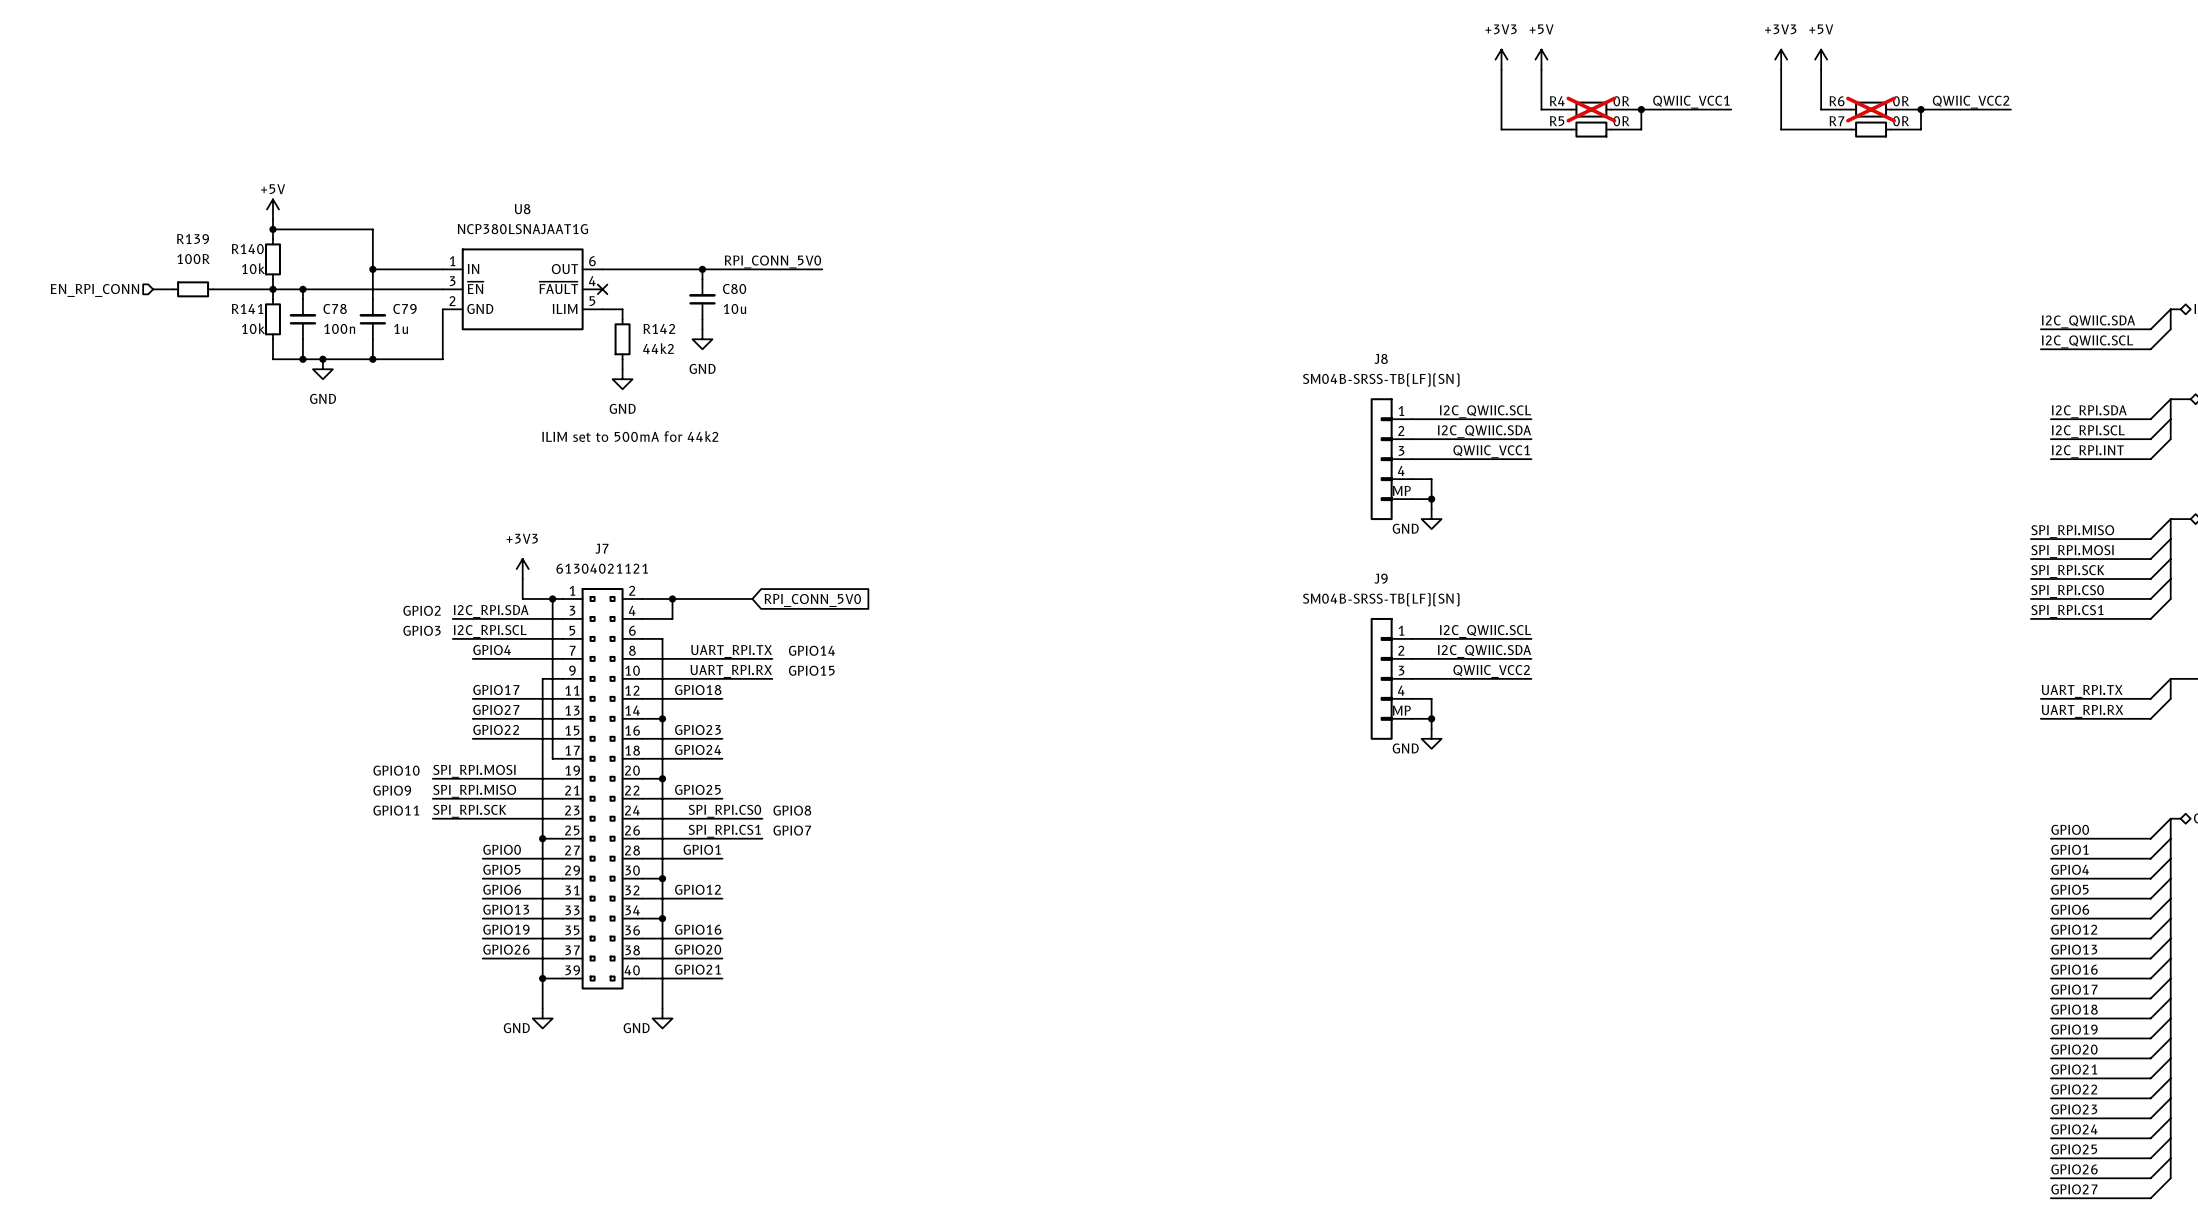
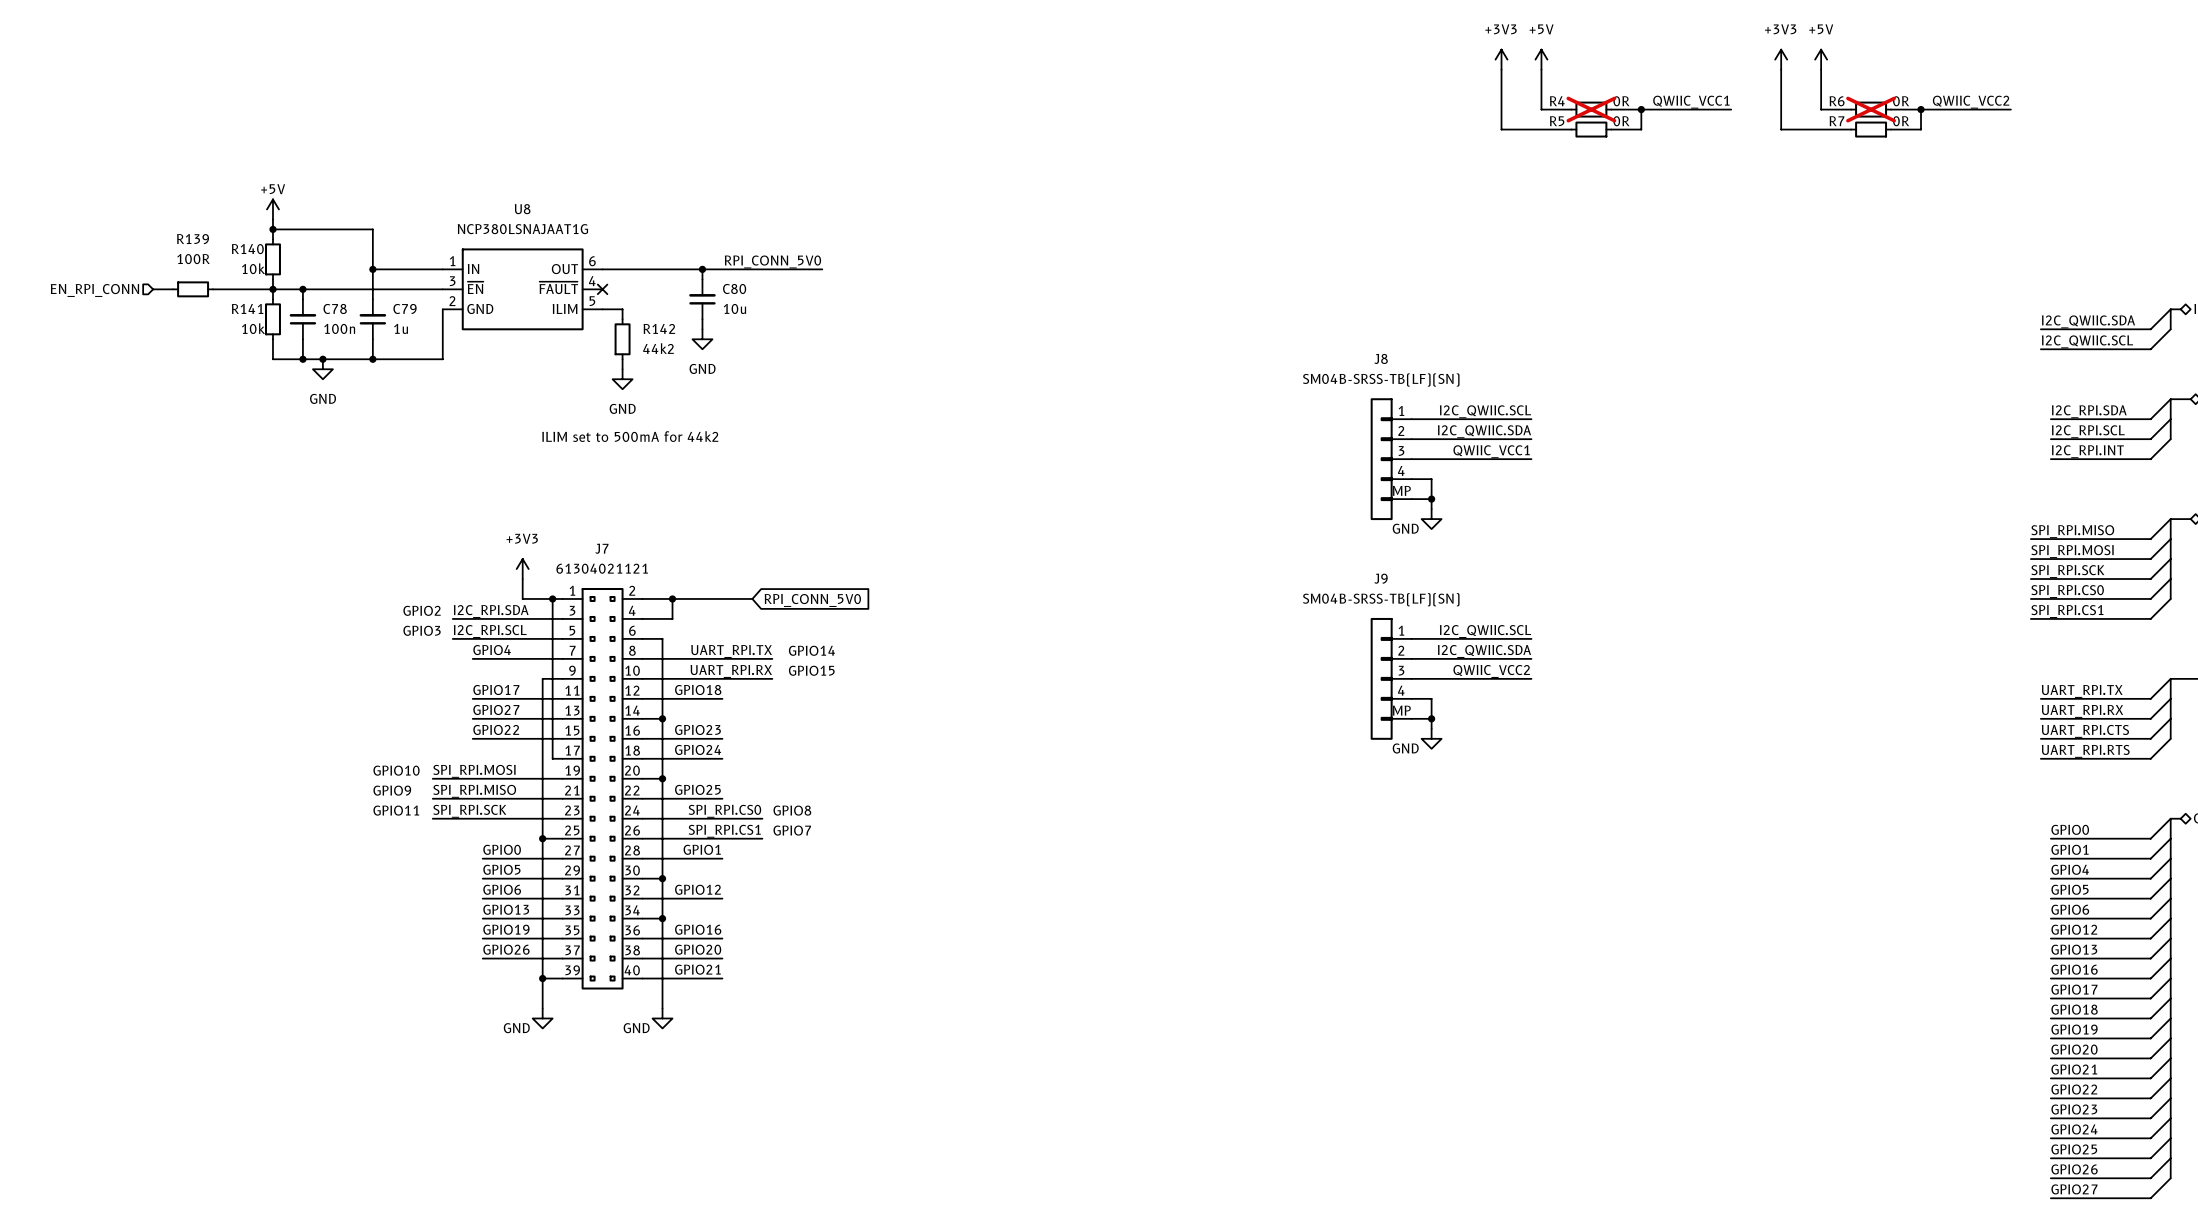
bus: none -> (2170, 698) (2170, 738)
wire: none -> (2170, 718) (2150, 738) (2040, 738)
label: none -> UART_RPI.CTS (2085, 731)
wire: none -> (2170, 738) (2150, 758) (2040, 758)
label: none -> UART_RPI.RTS (2085, 751)

